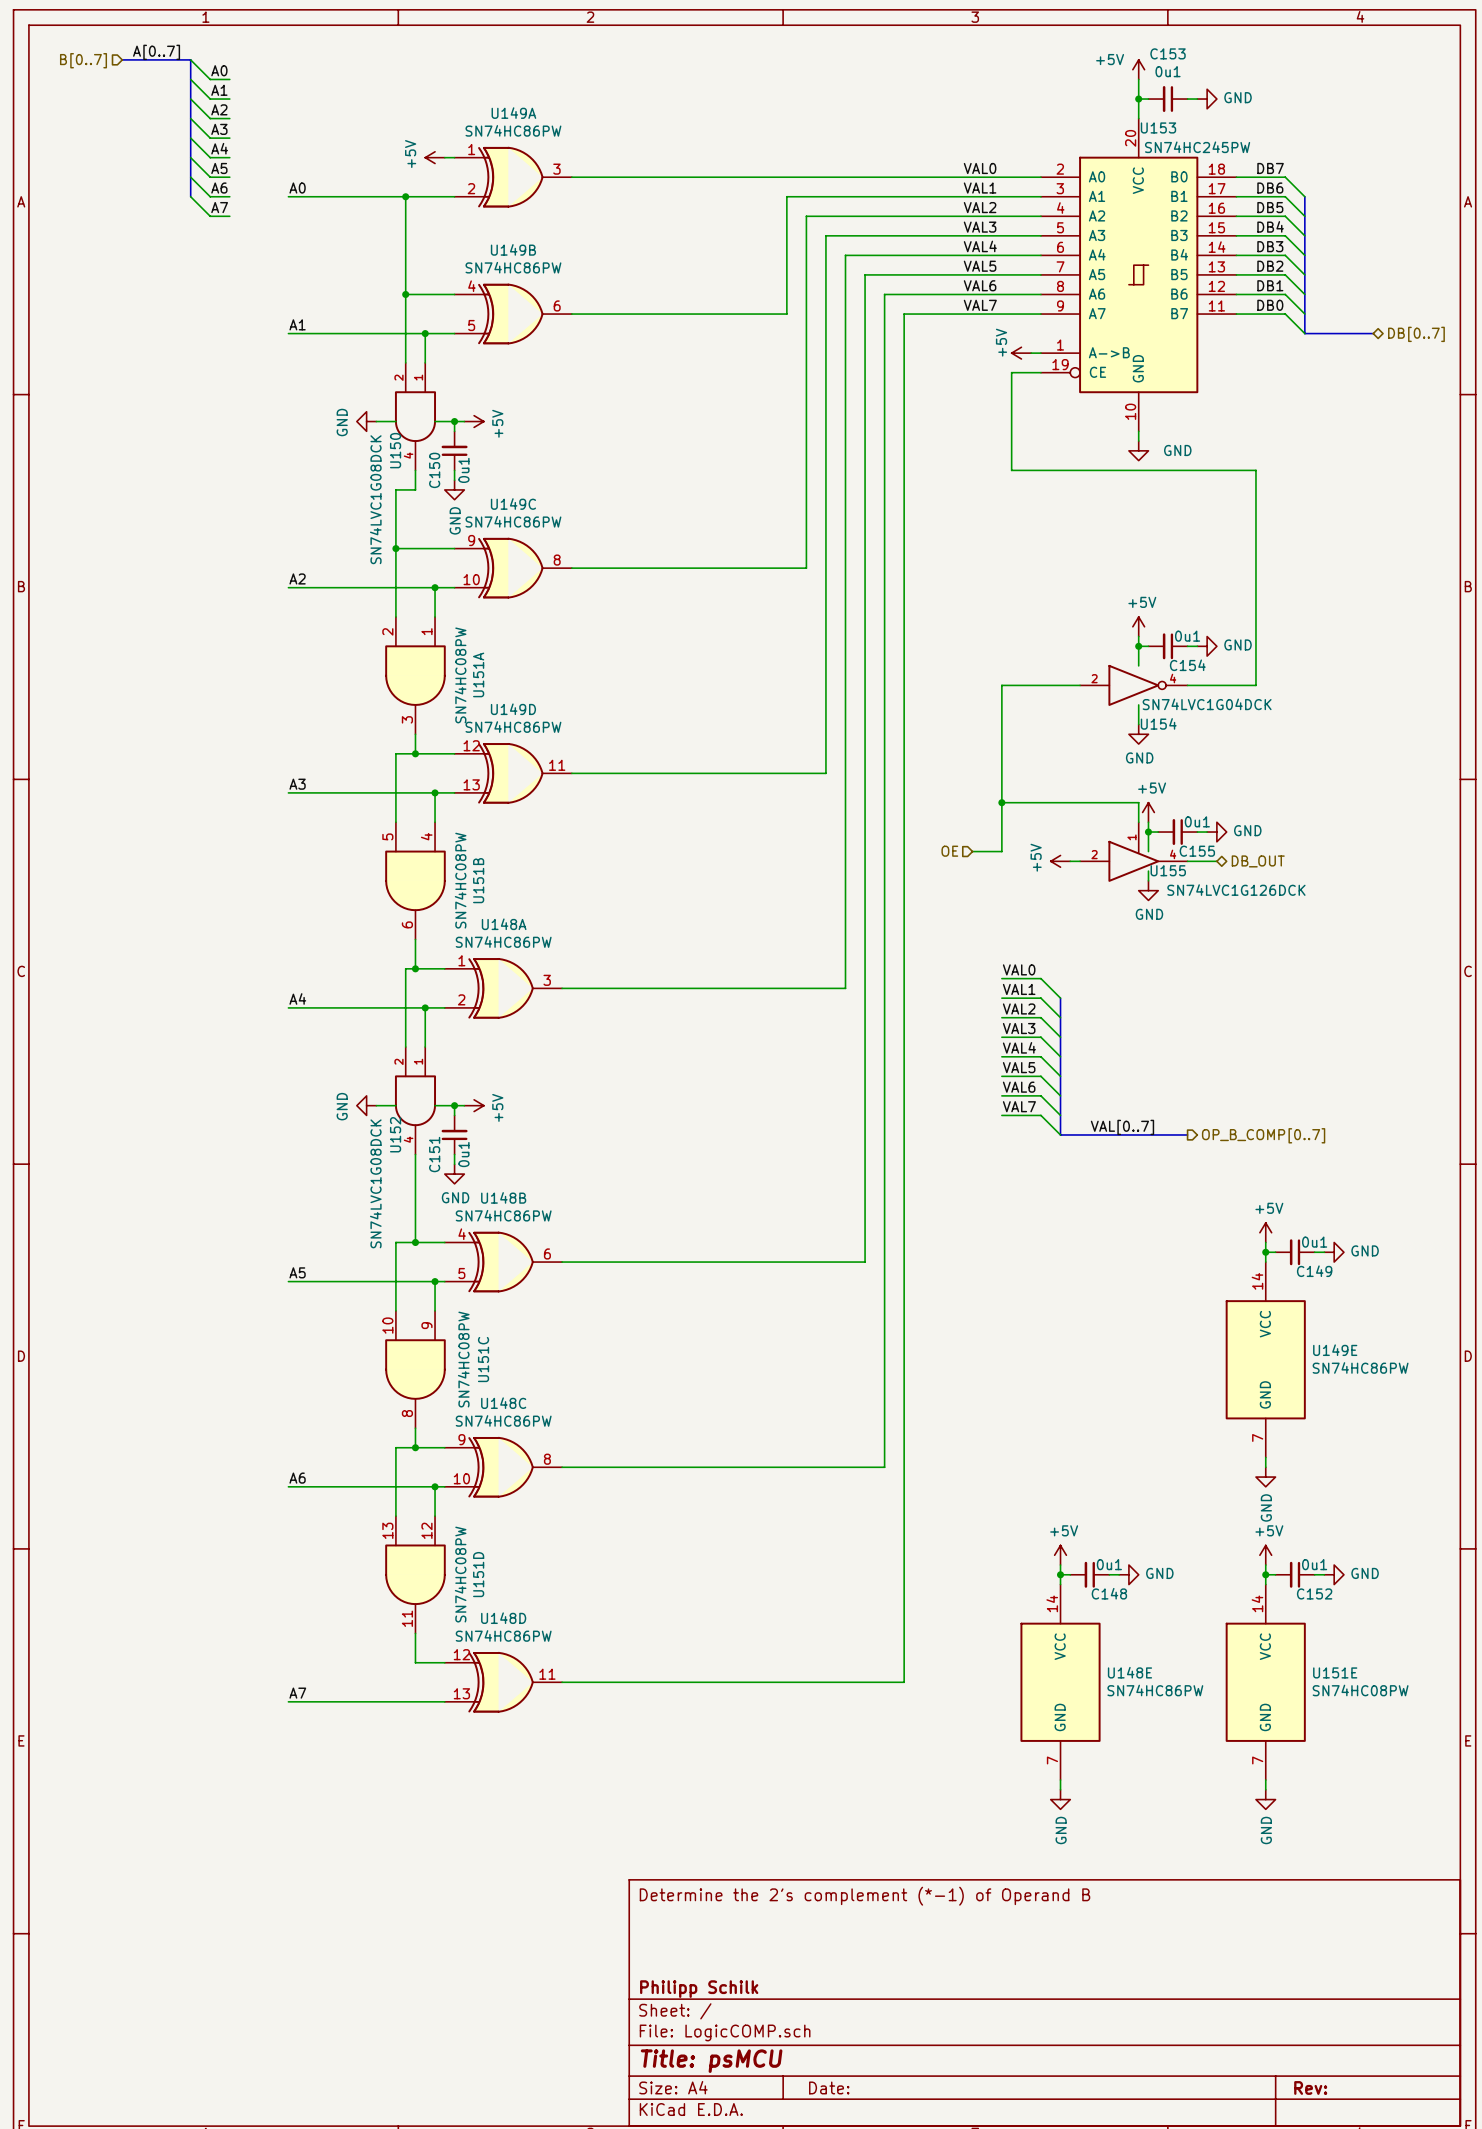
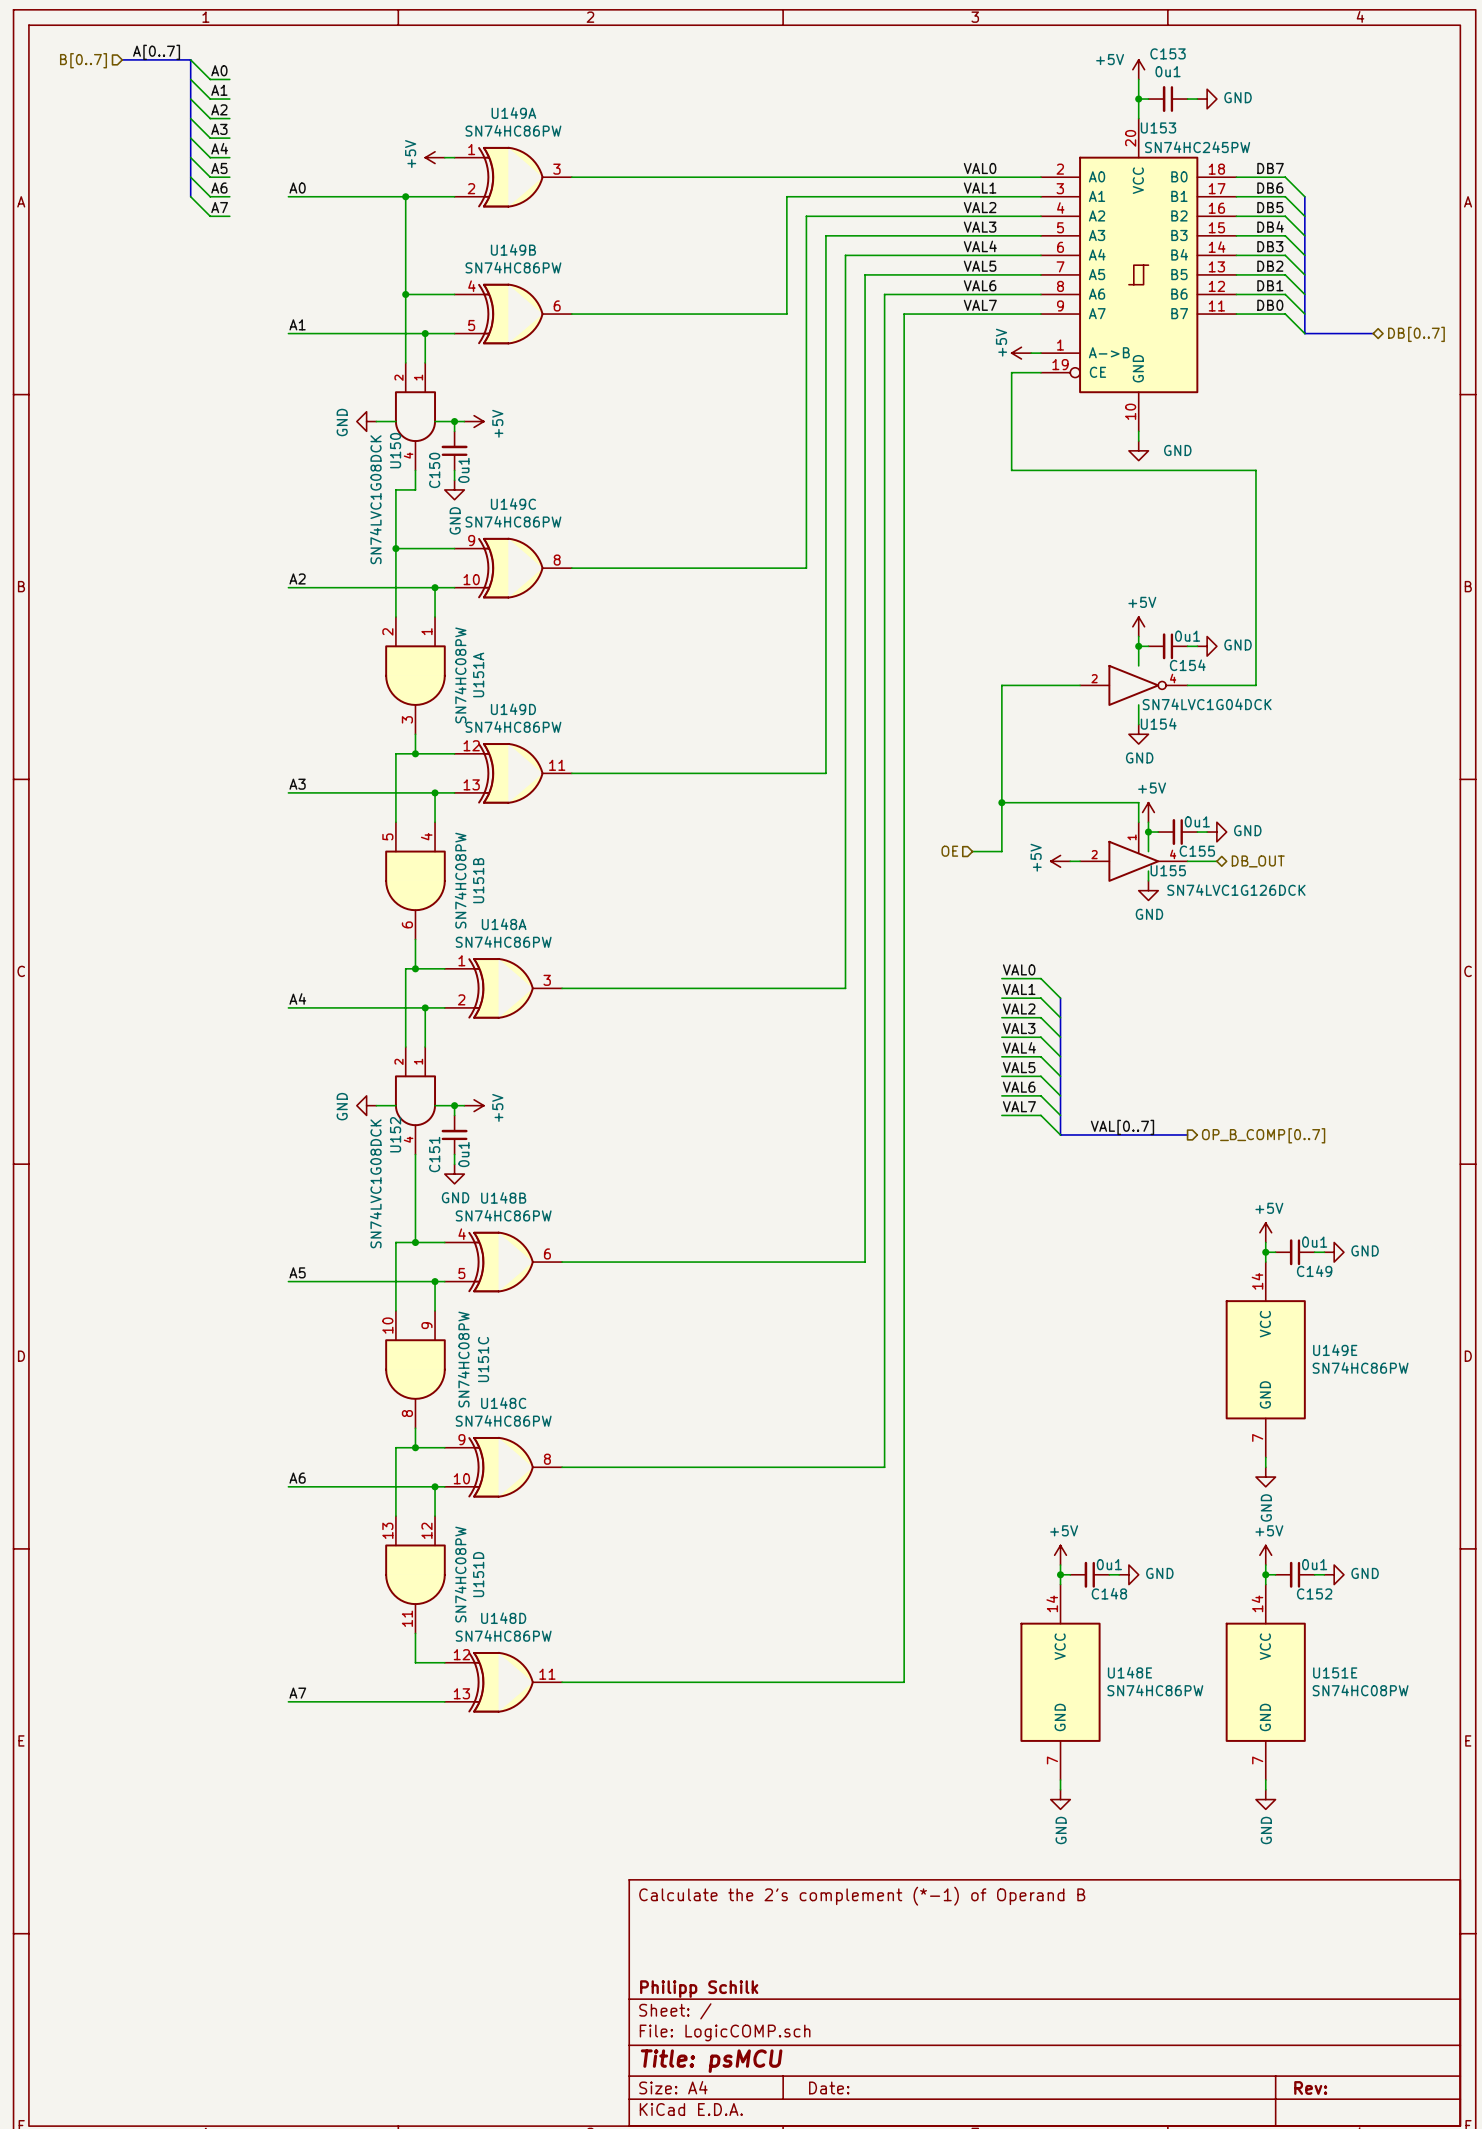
title block: Determine the 2's complement (*-1) of Operand B (865, 1896) -> Calculate the 2's complement (*-1) of Operand B (862, 1896)

